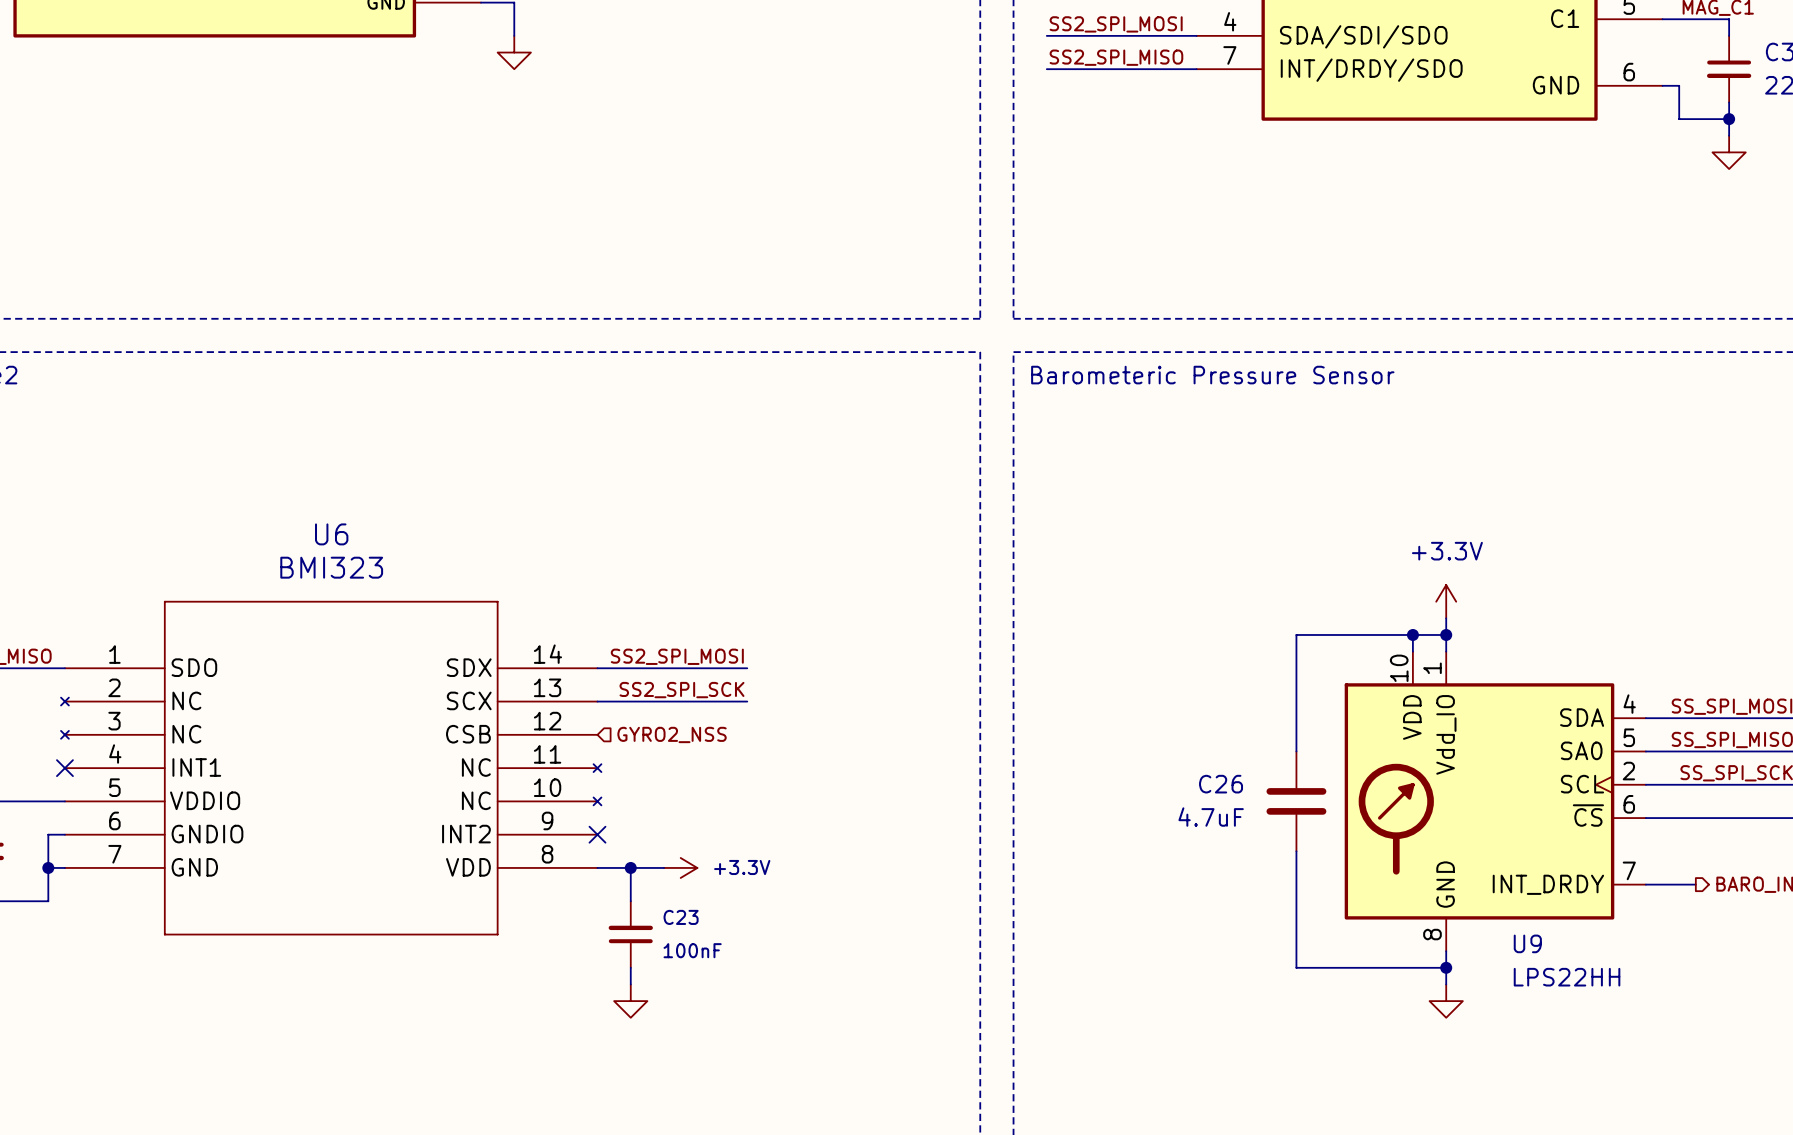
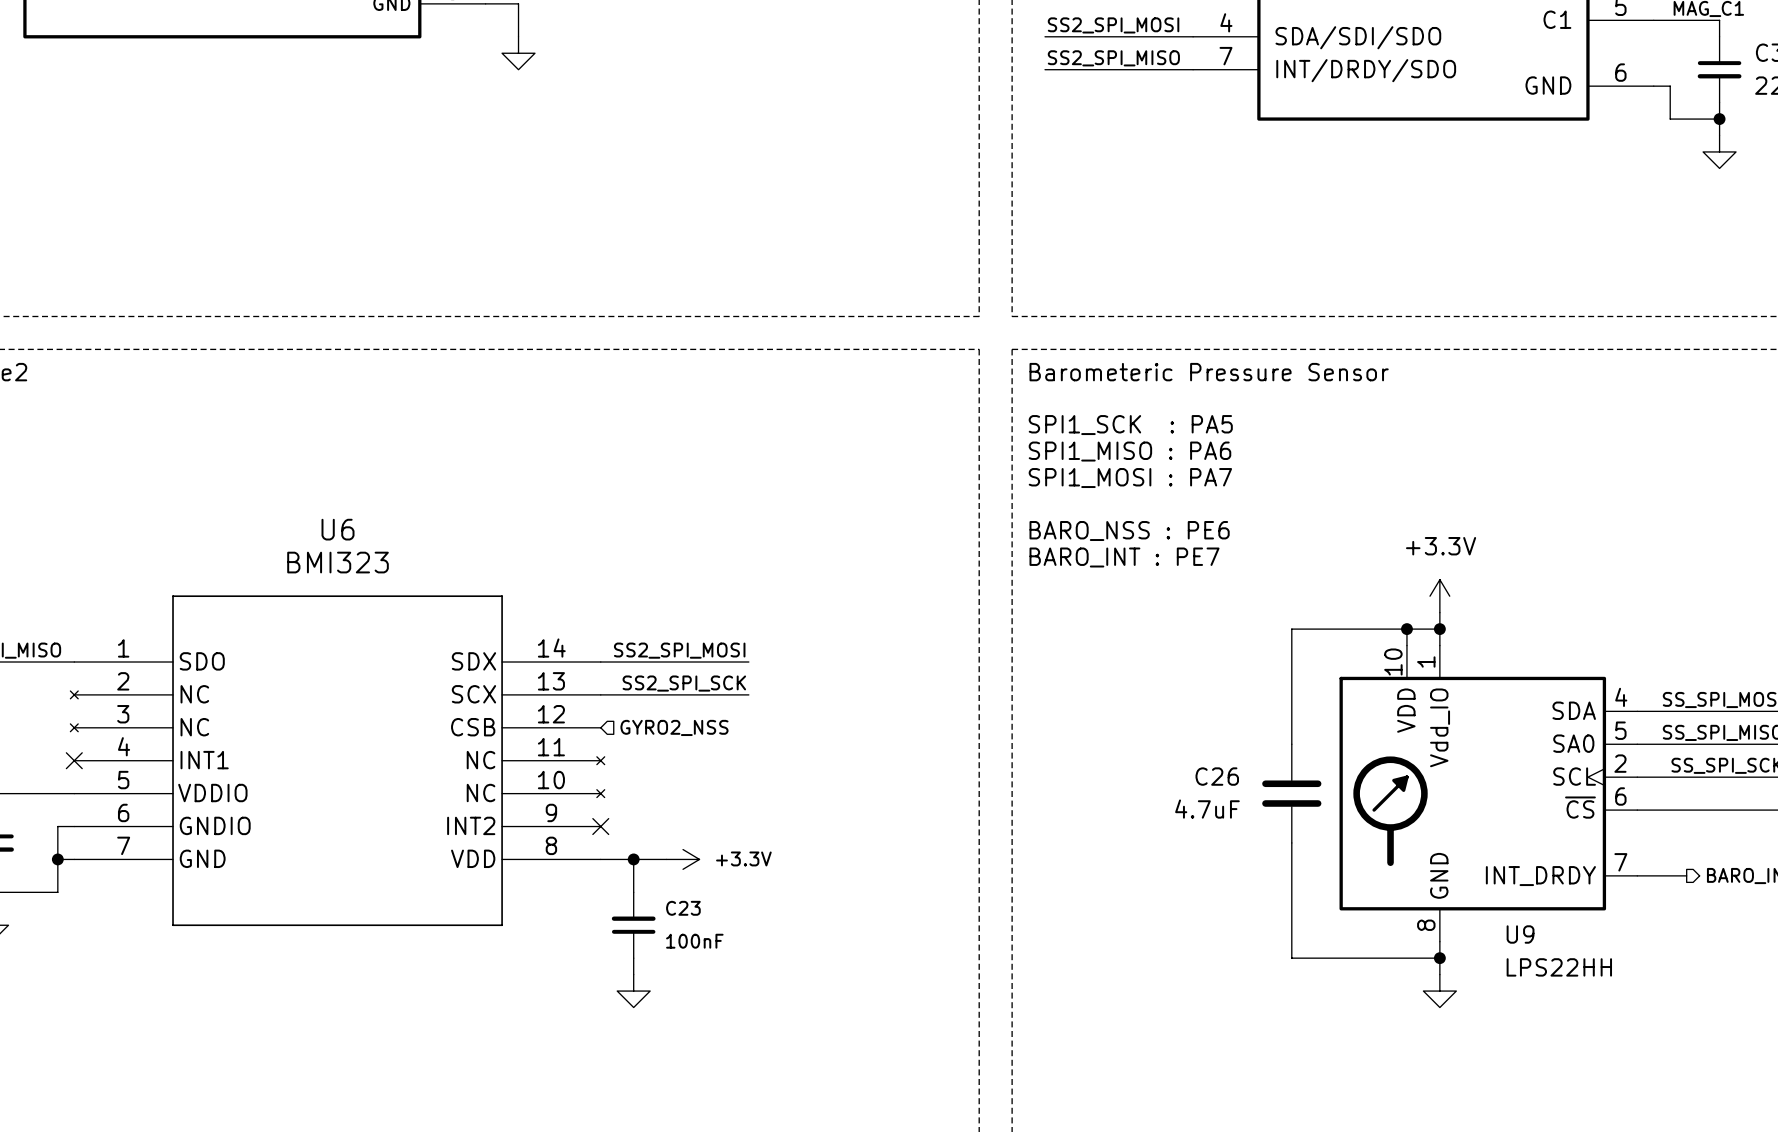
text: none -> SPI1_SCK : PA5 (1130, 425)
text: none -> SPI1_MISO : PA6 (1129, 451)
text: none -> SPI1_MOSI : PA7 (1130, 478)
text: none -> BARO_NSS : PE6 (1129, 531)
text: none -> BARO_INT : PE7 (1124, 557)

